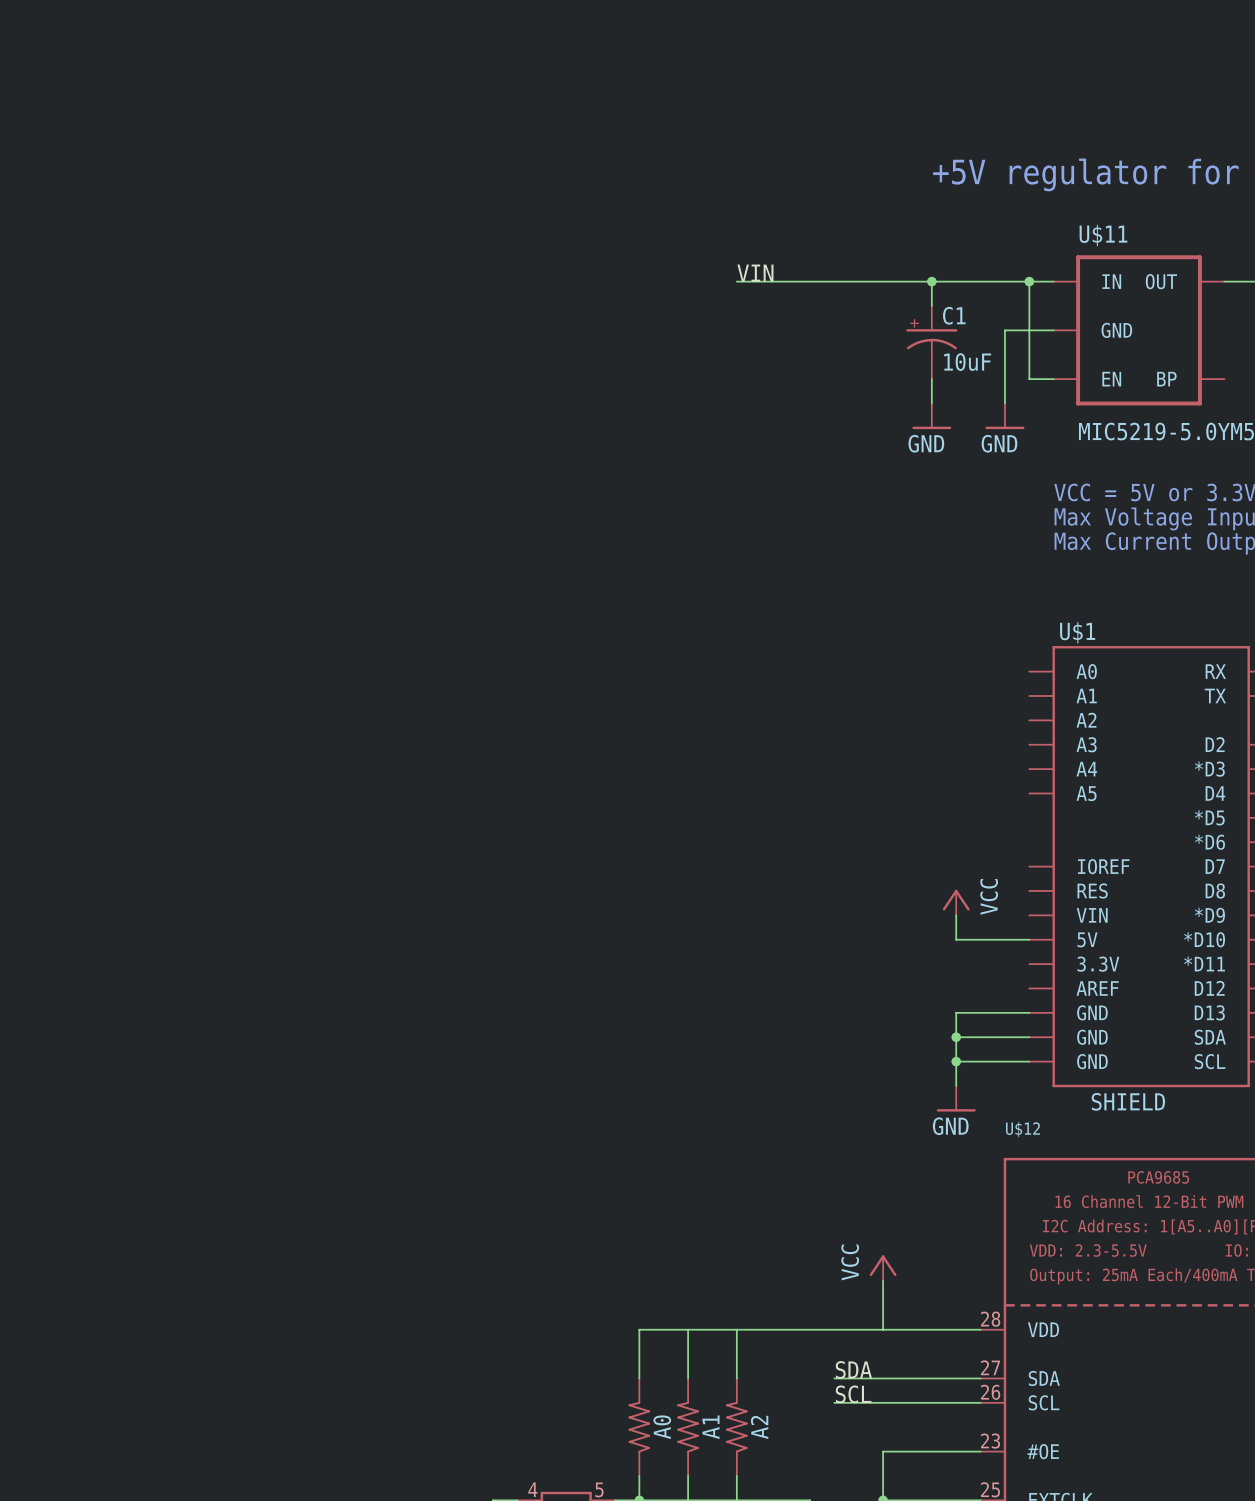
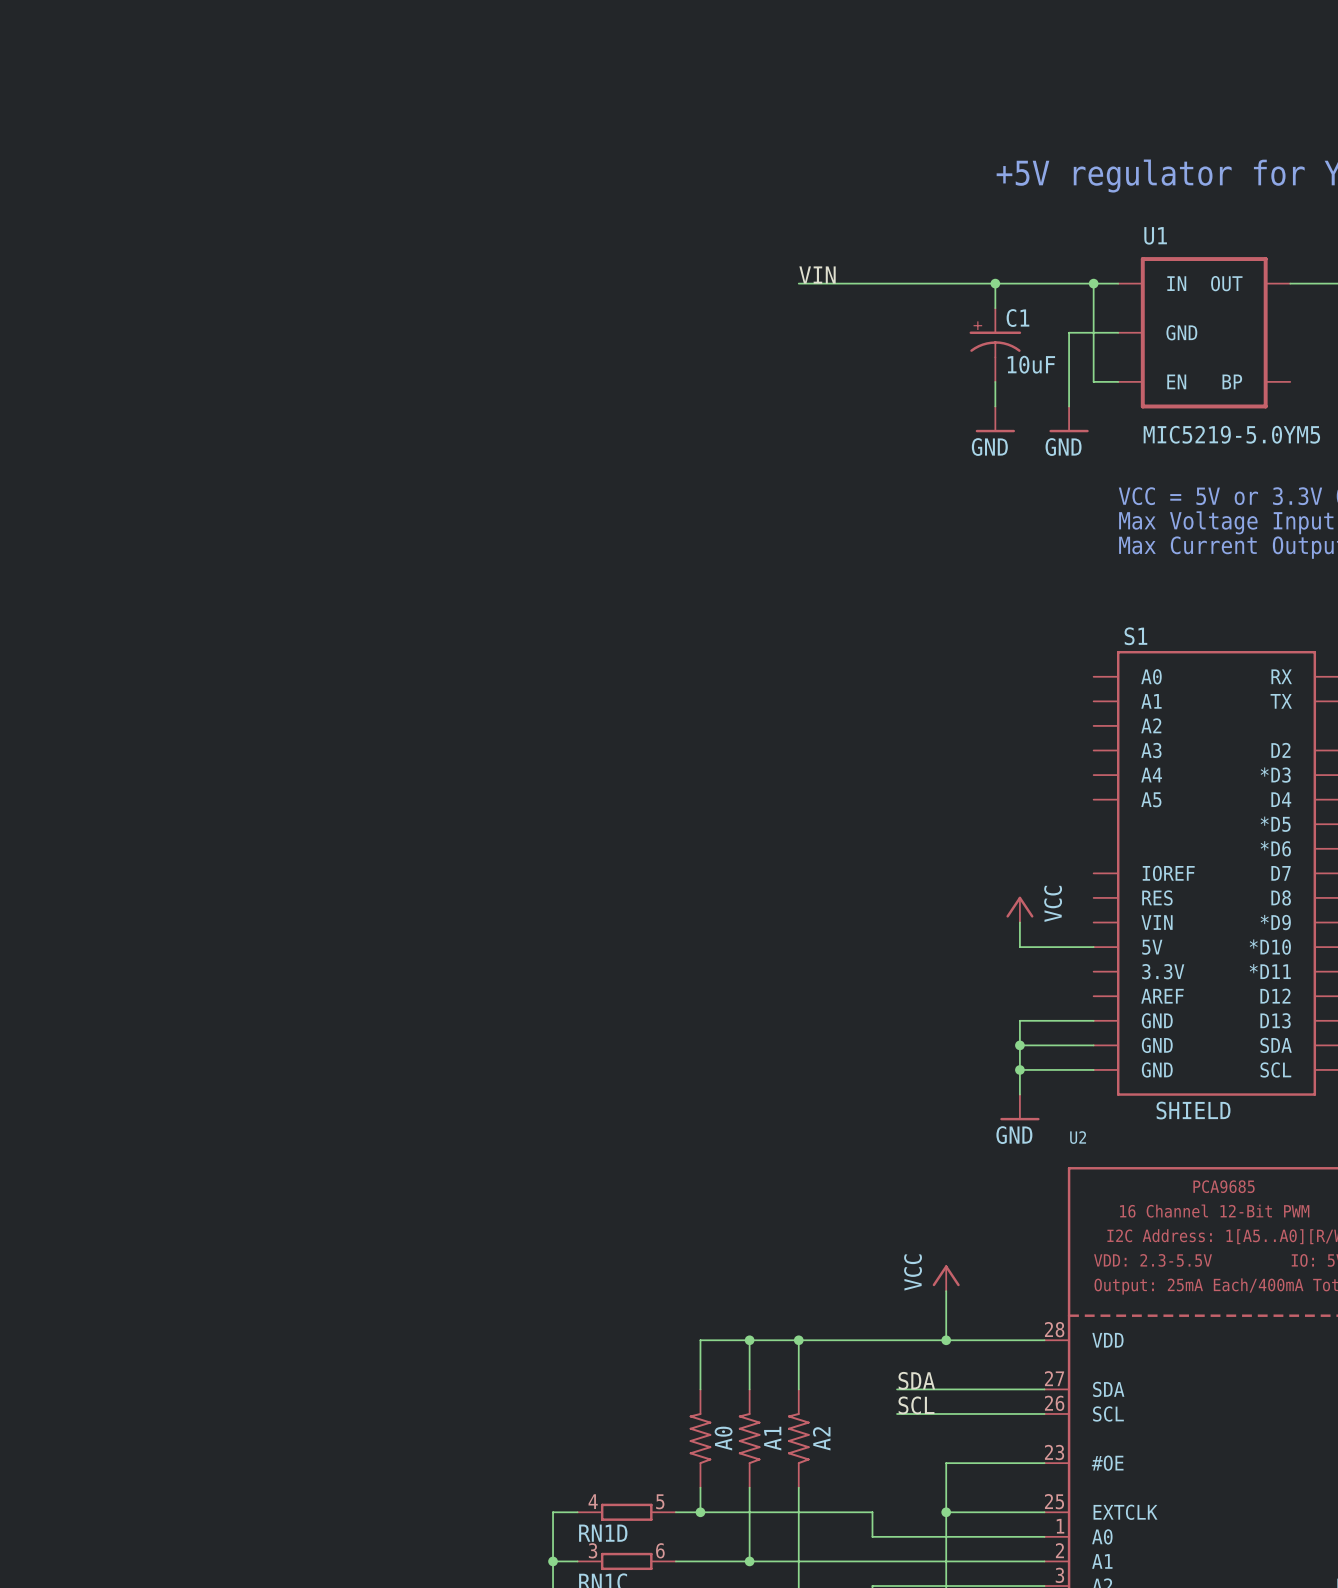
U$11 name: U$11 (1103, 235) -> U1 (1155, 235)
U$1 name: U$1 (1077, 632) -> S1 (1135, 636)
U$12 name: U$12 (1022, 1129) -> U2 (1078, 1137)
junction: none -> (749, 1340)
junction: none -> (798, 1340)
junction: none -> (946, 1340)

